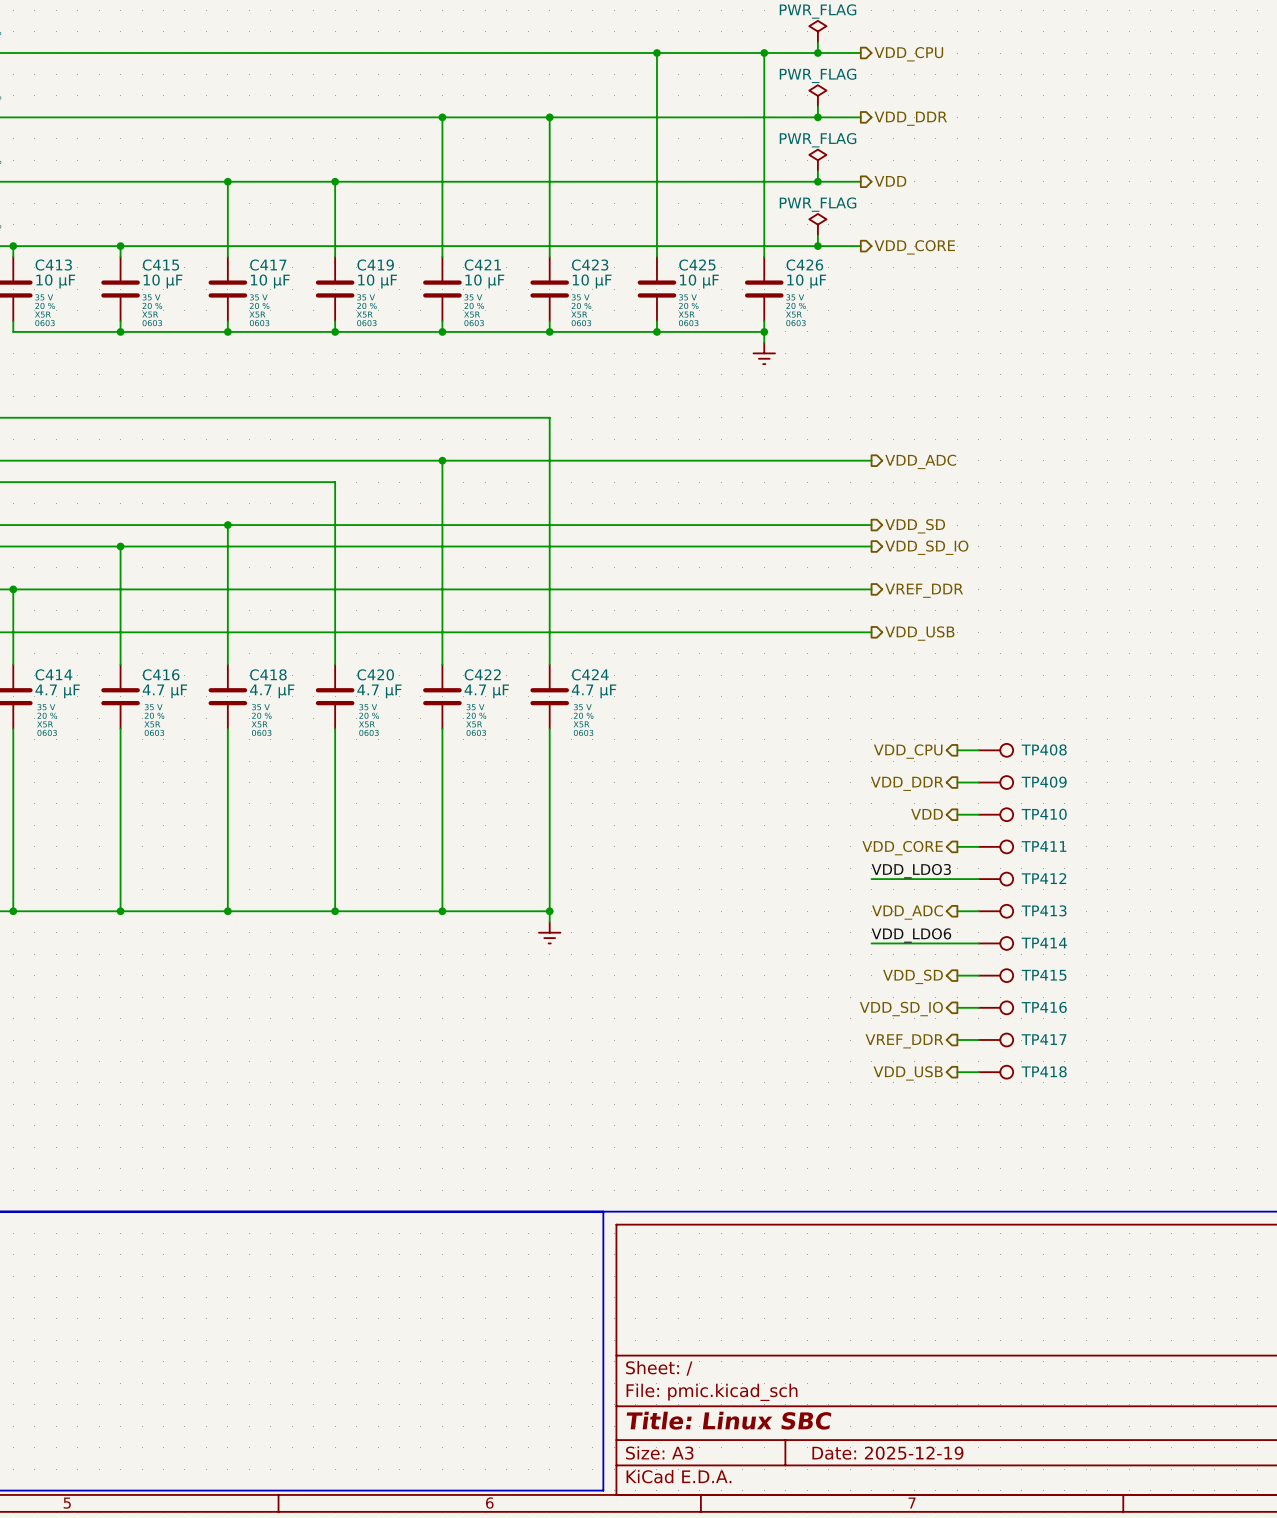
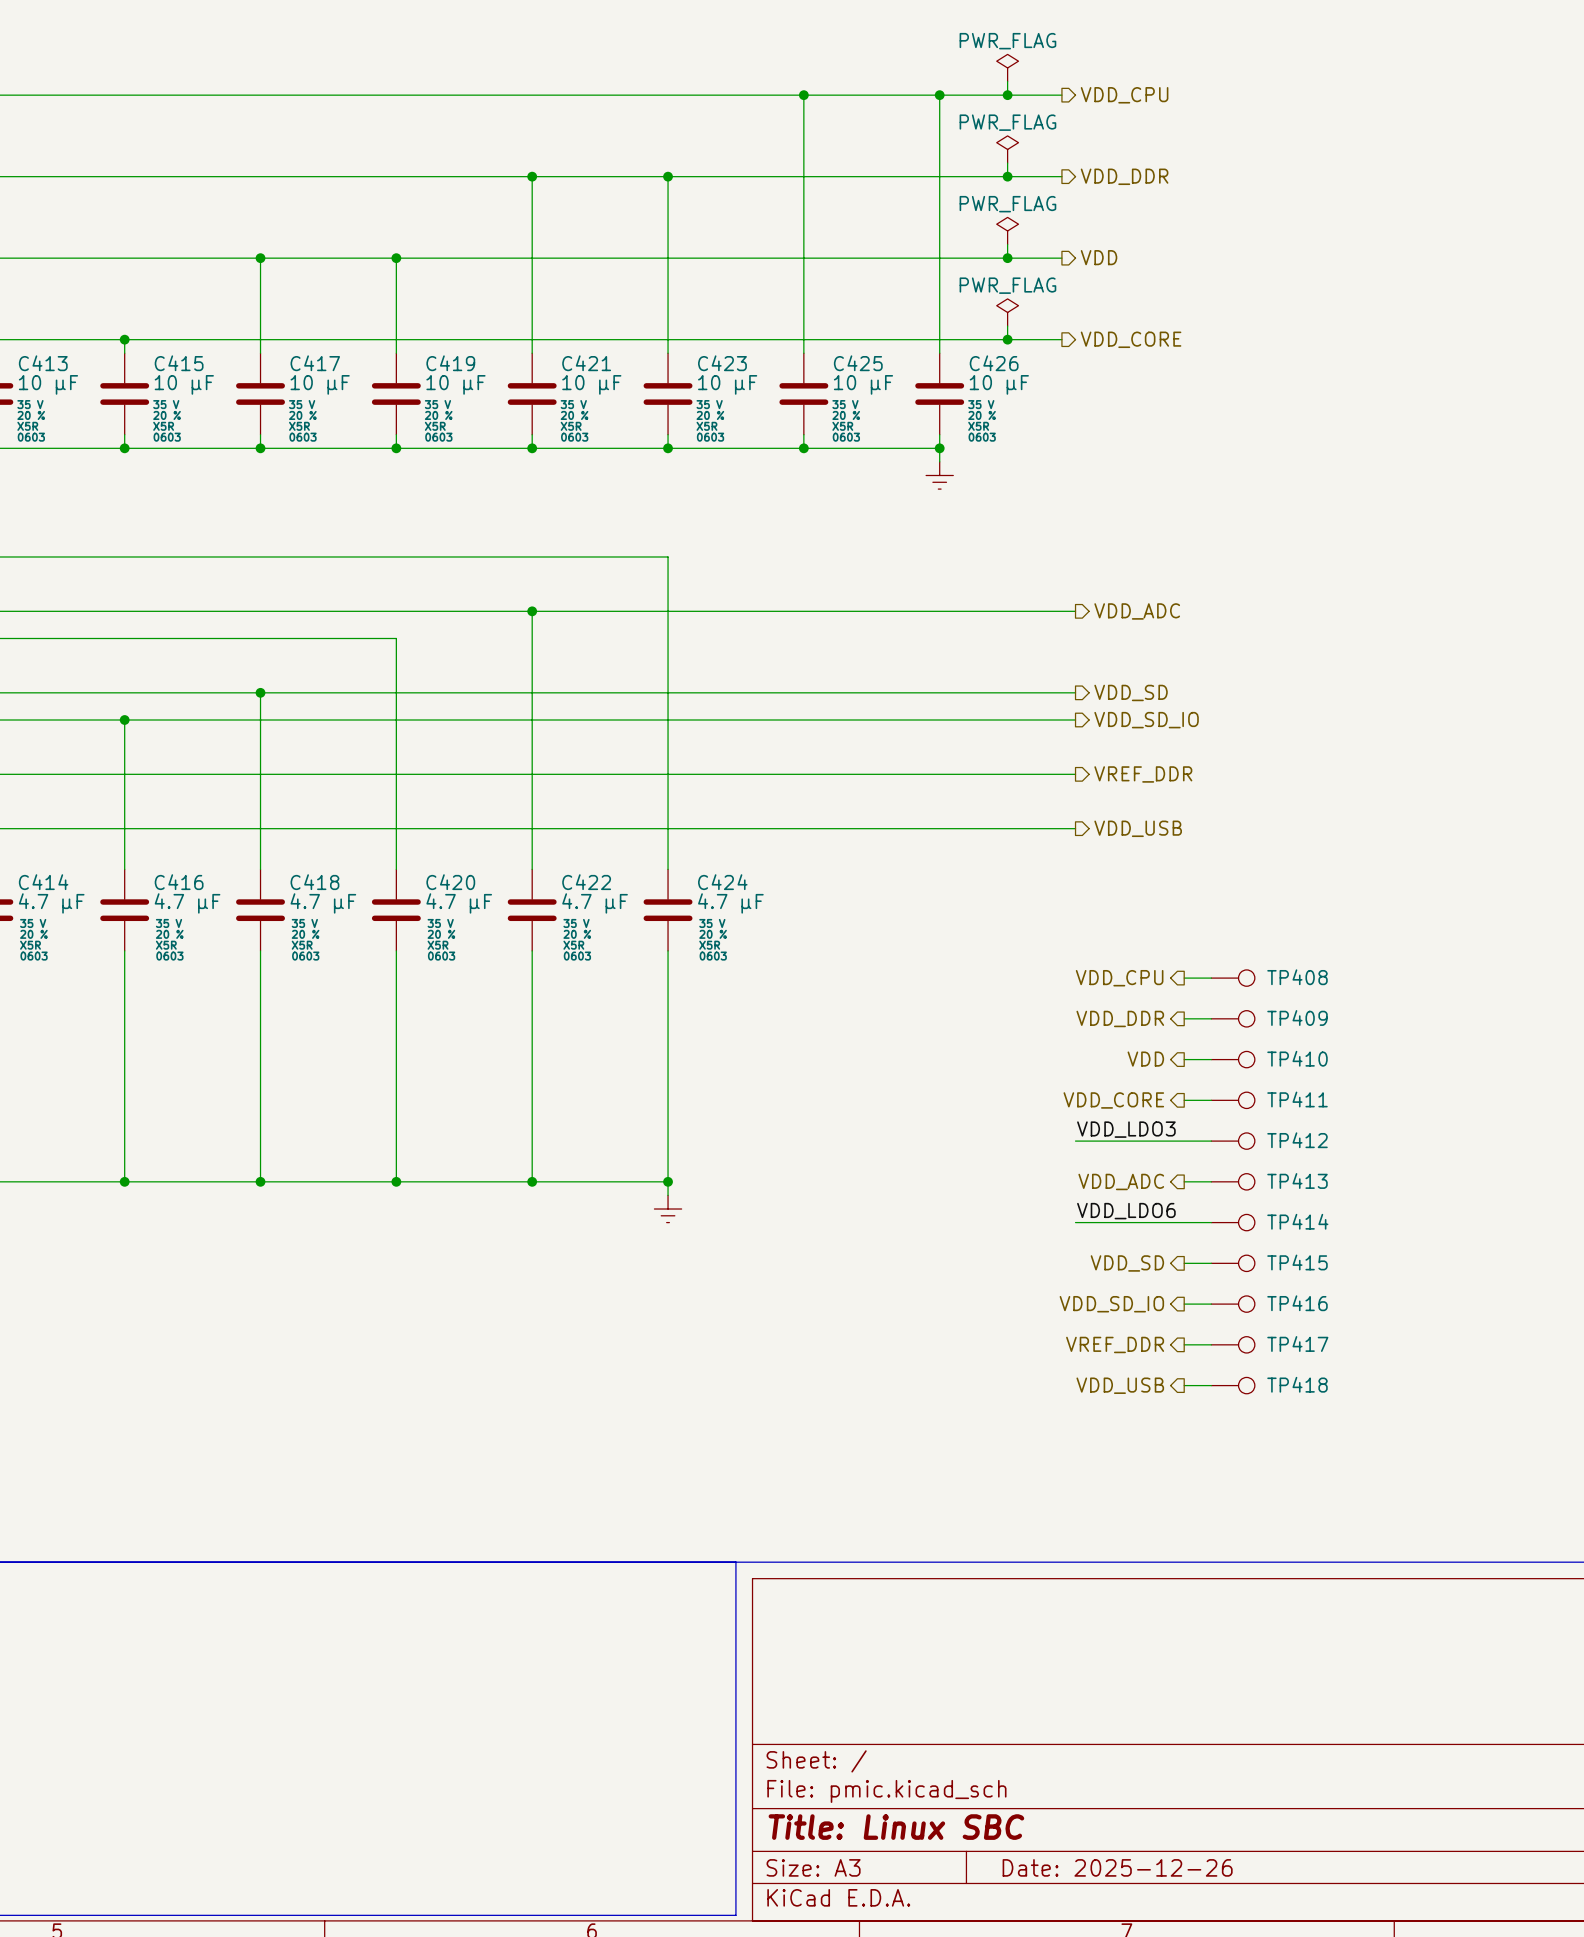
title block: Date: 2025-12-19 (887, 1453) -> Date: 2025-12-26 (1117, 1867)

